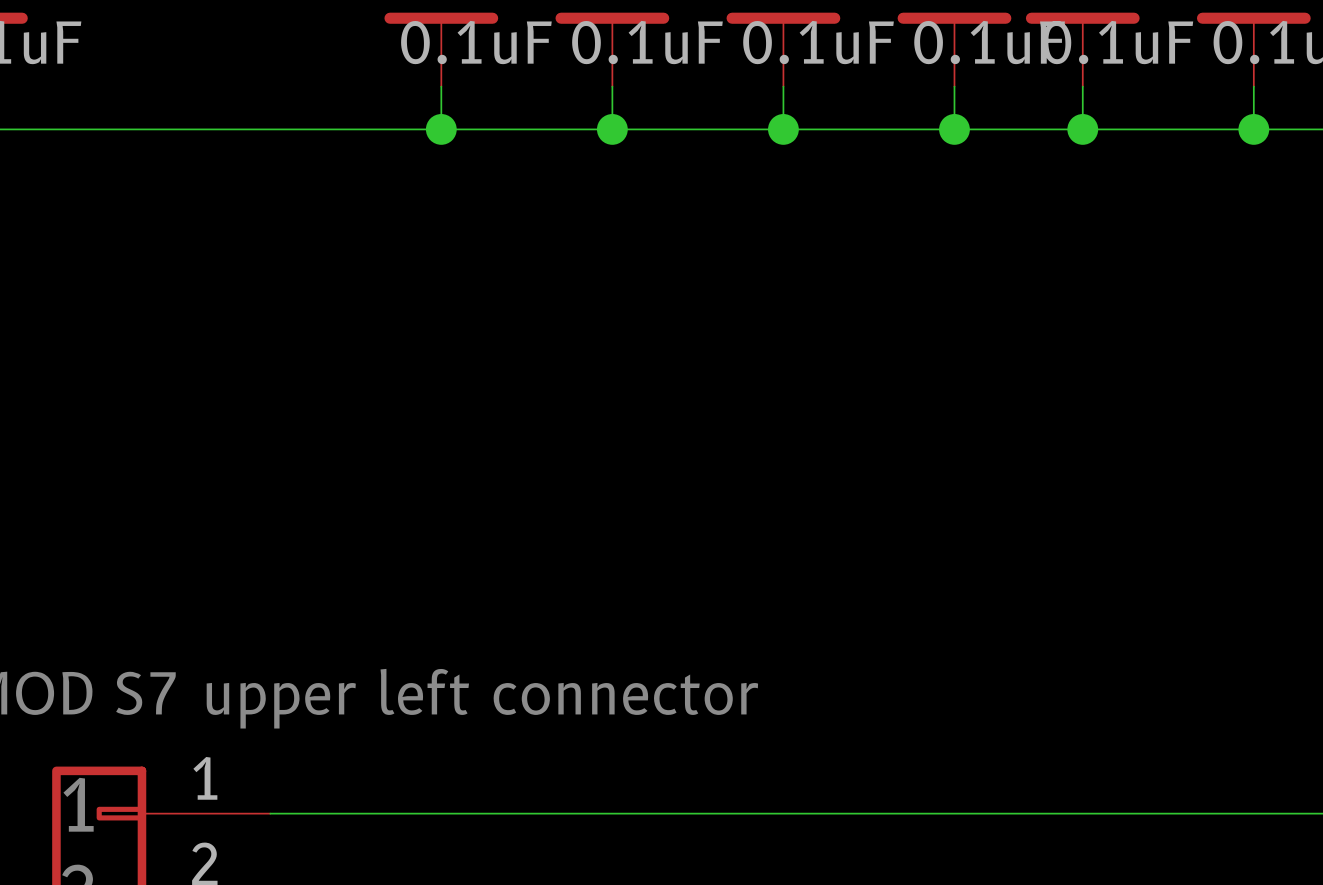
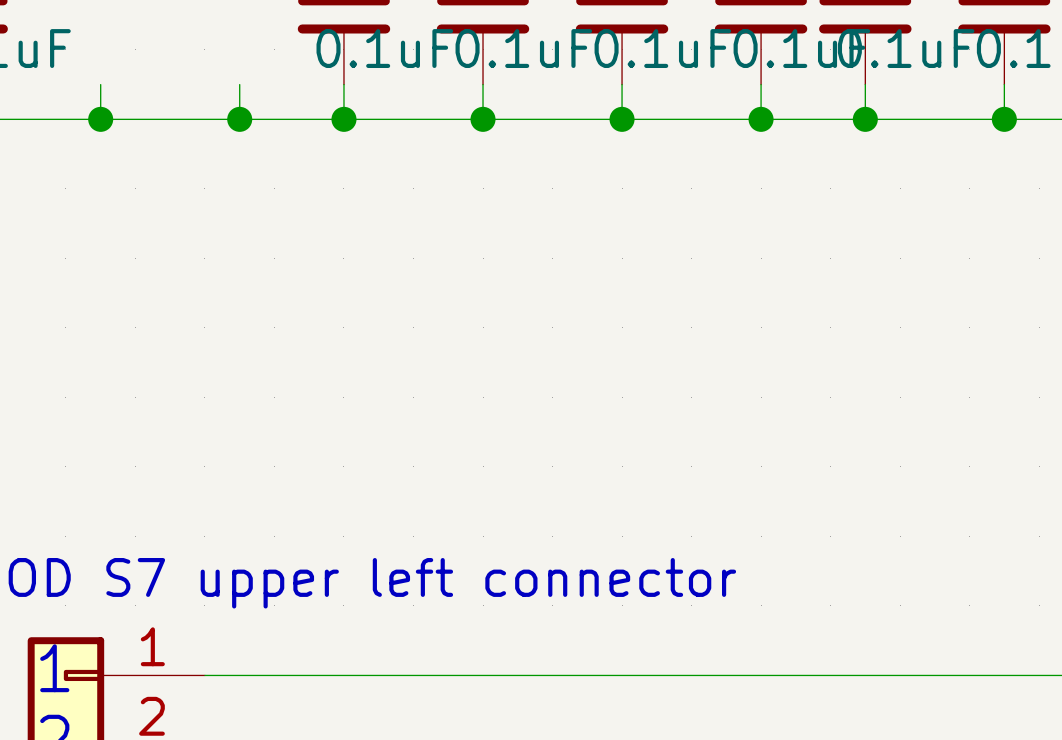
wire: none -> (100, 84) (100, 119)
wire: none -> (239, 84) (239, 119)
junction: none -> (100, 119)
junction: none -> (239, 119)

